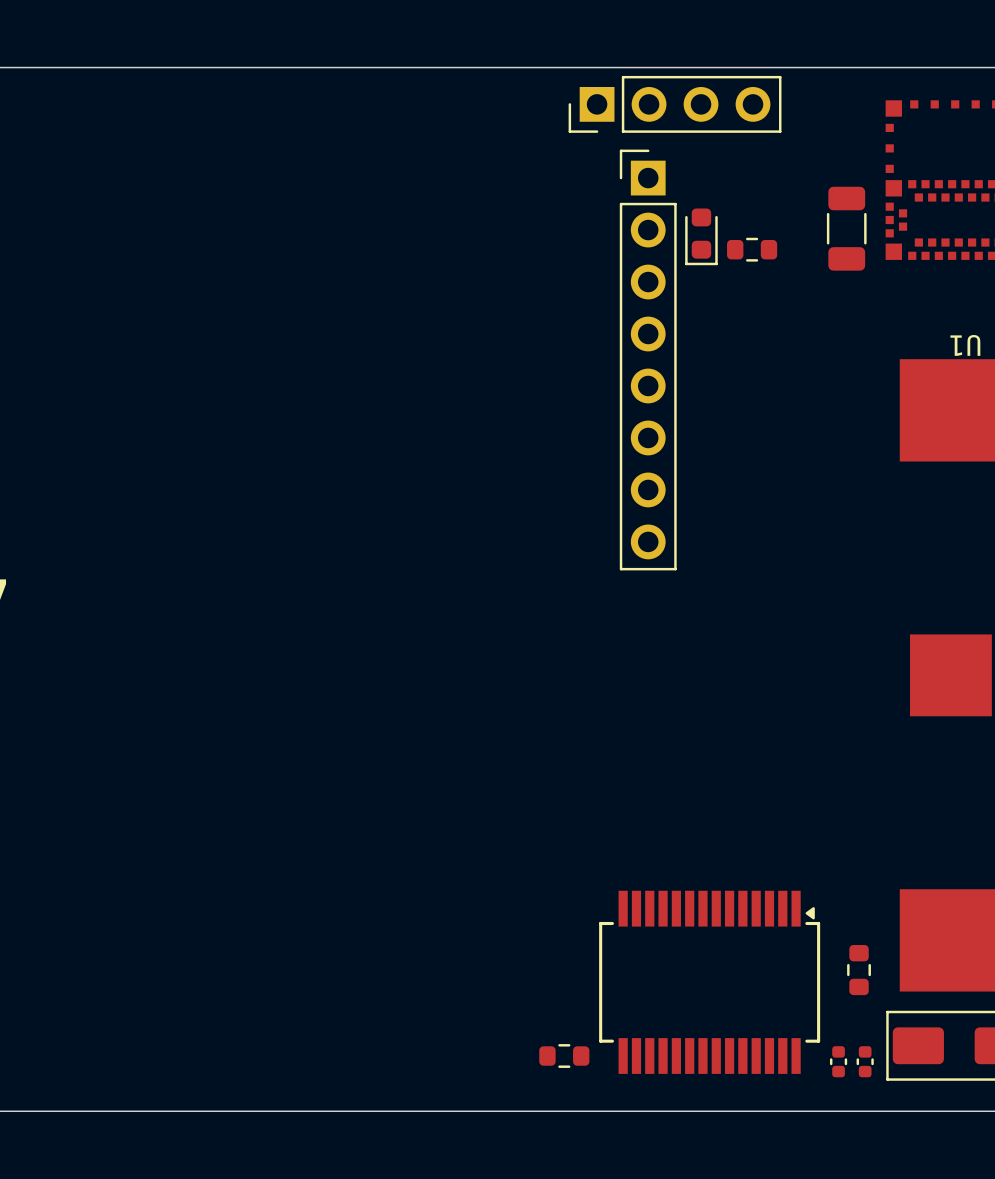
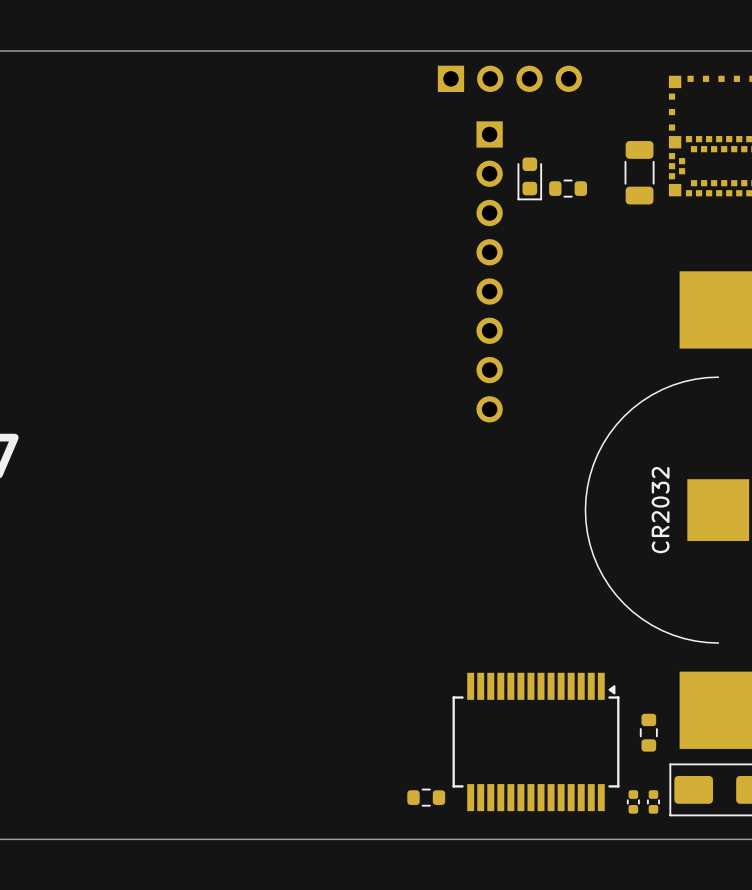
part side: top (675, 104) -> bottom (509, 78)
U1 name: U1 (965, 345) -> none
part side: top (648, 359) -> bottom (489, 271)
line: none -> (718, 377) (695, 379) (672, 385) (642, 401) (624, 416) (603, 443) (593, 464) (587, 487) (585, 510) (587, 533) (597, 566) (609, 586) (624, 604) (642, 619) (672, 635) (695, 641) (718, 643)
text: none -> CR2032 (660, 510)

